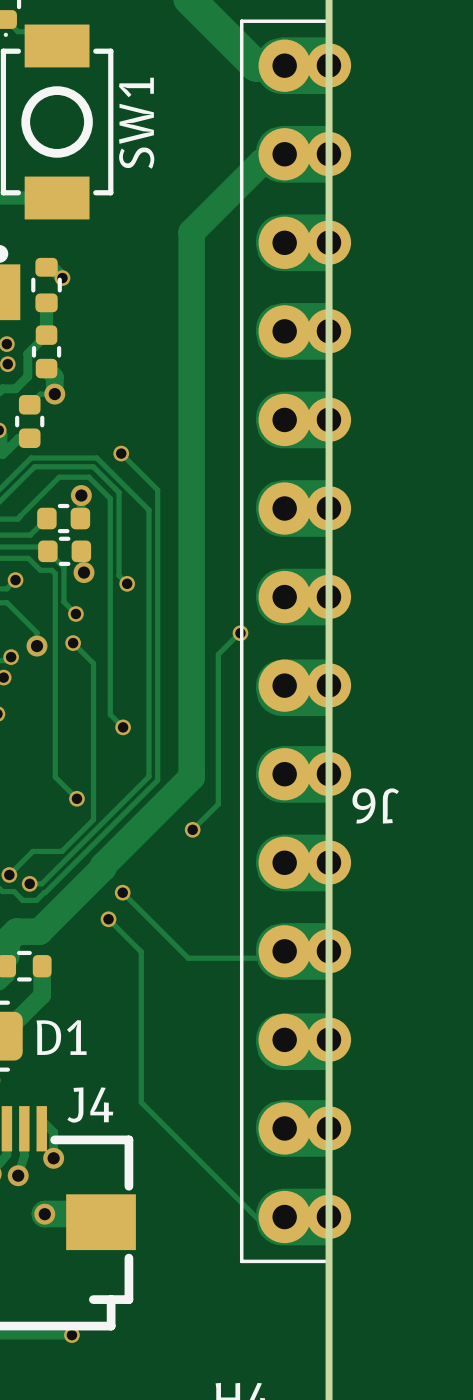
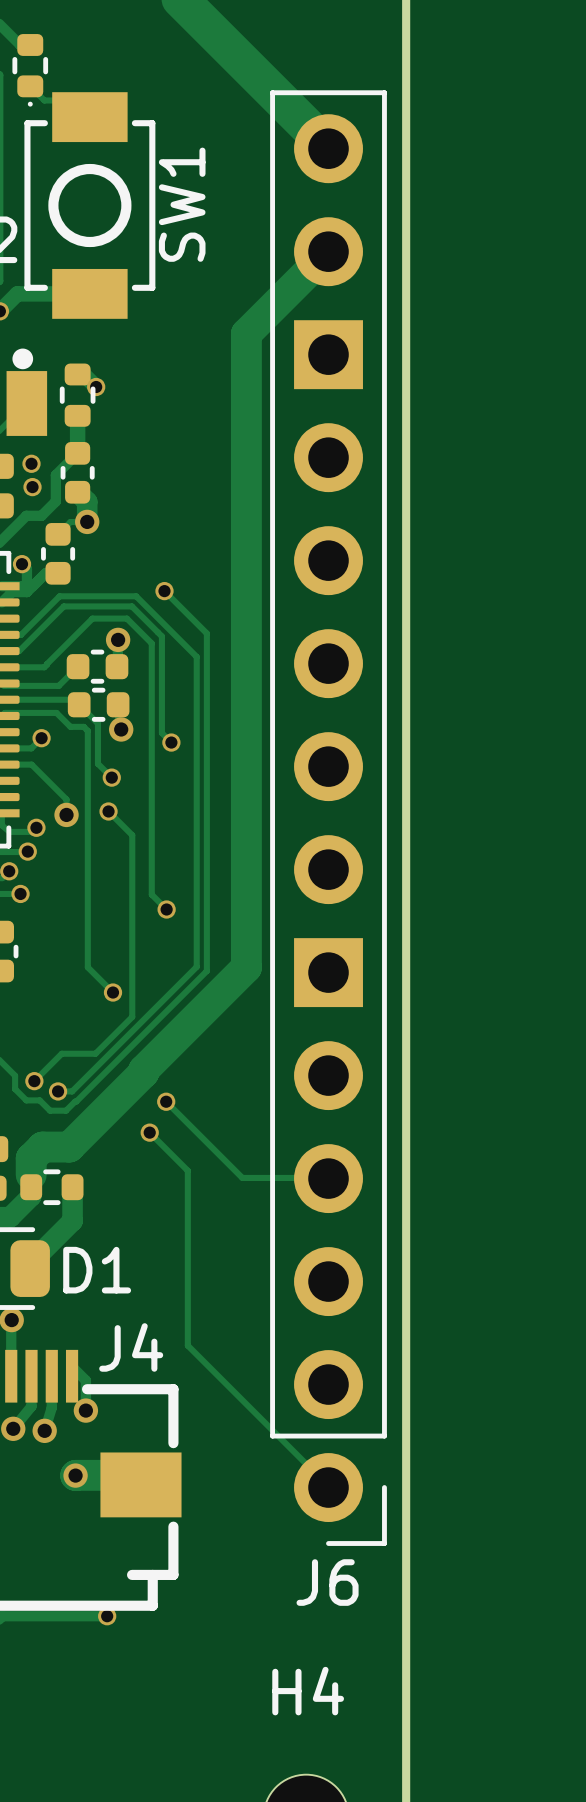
J6 footprint: [239, 19, 352, 1264] -> [270, 90, 387, 1546]
track: (240, 633) (218, 654) (218, 804) (192, 829) -> none
via: (240, 633) -> none
J6 name position: J6 (375, 805) -> J6 (327, 1582)
via: (192, 829) -> none

